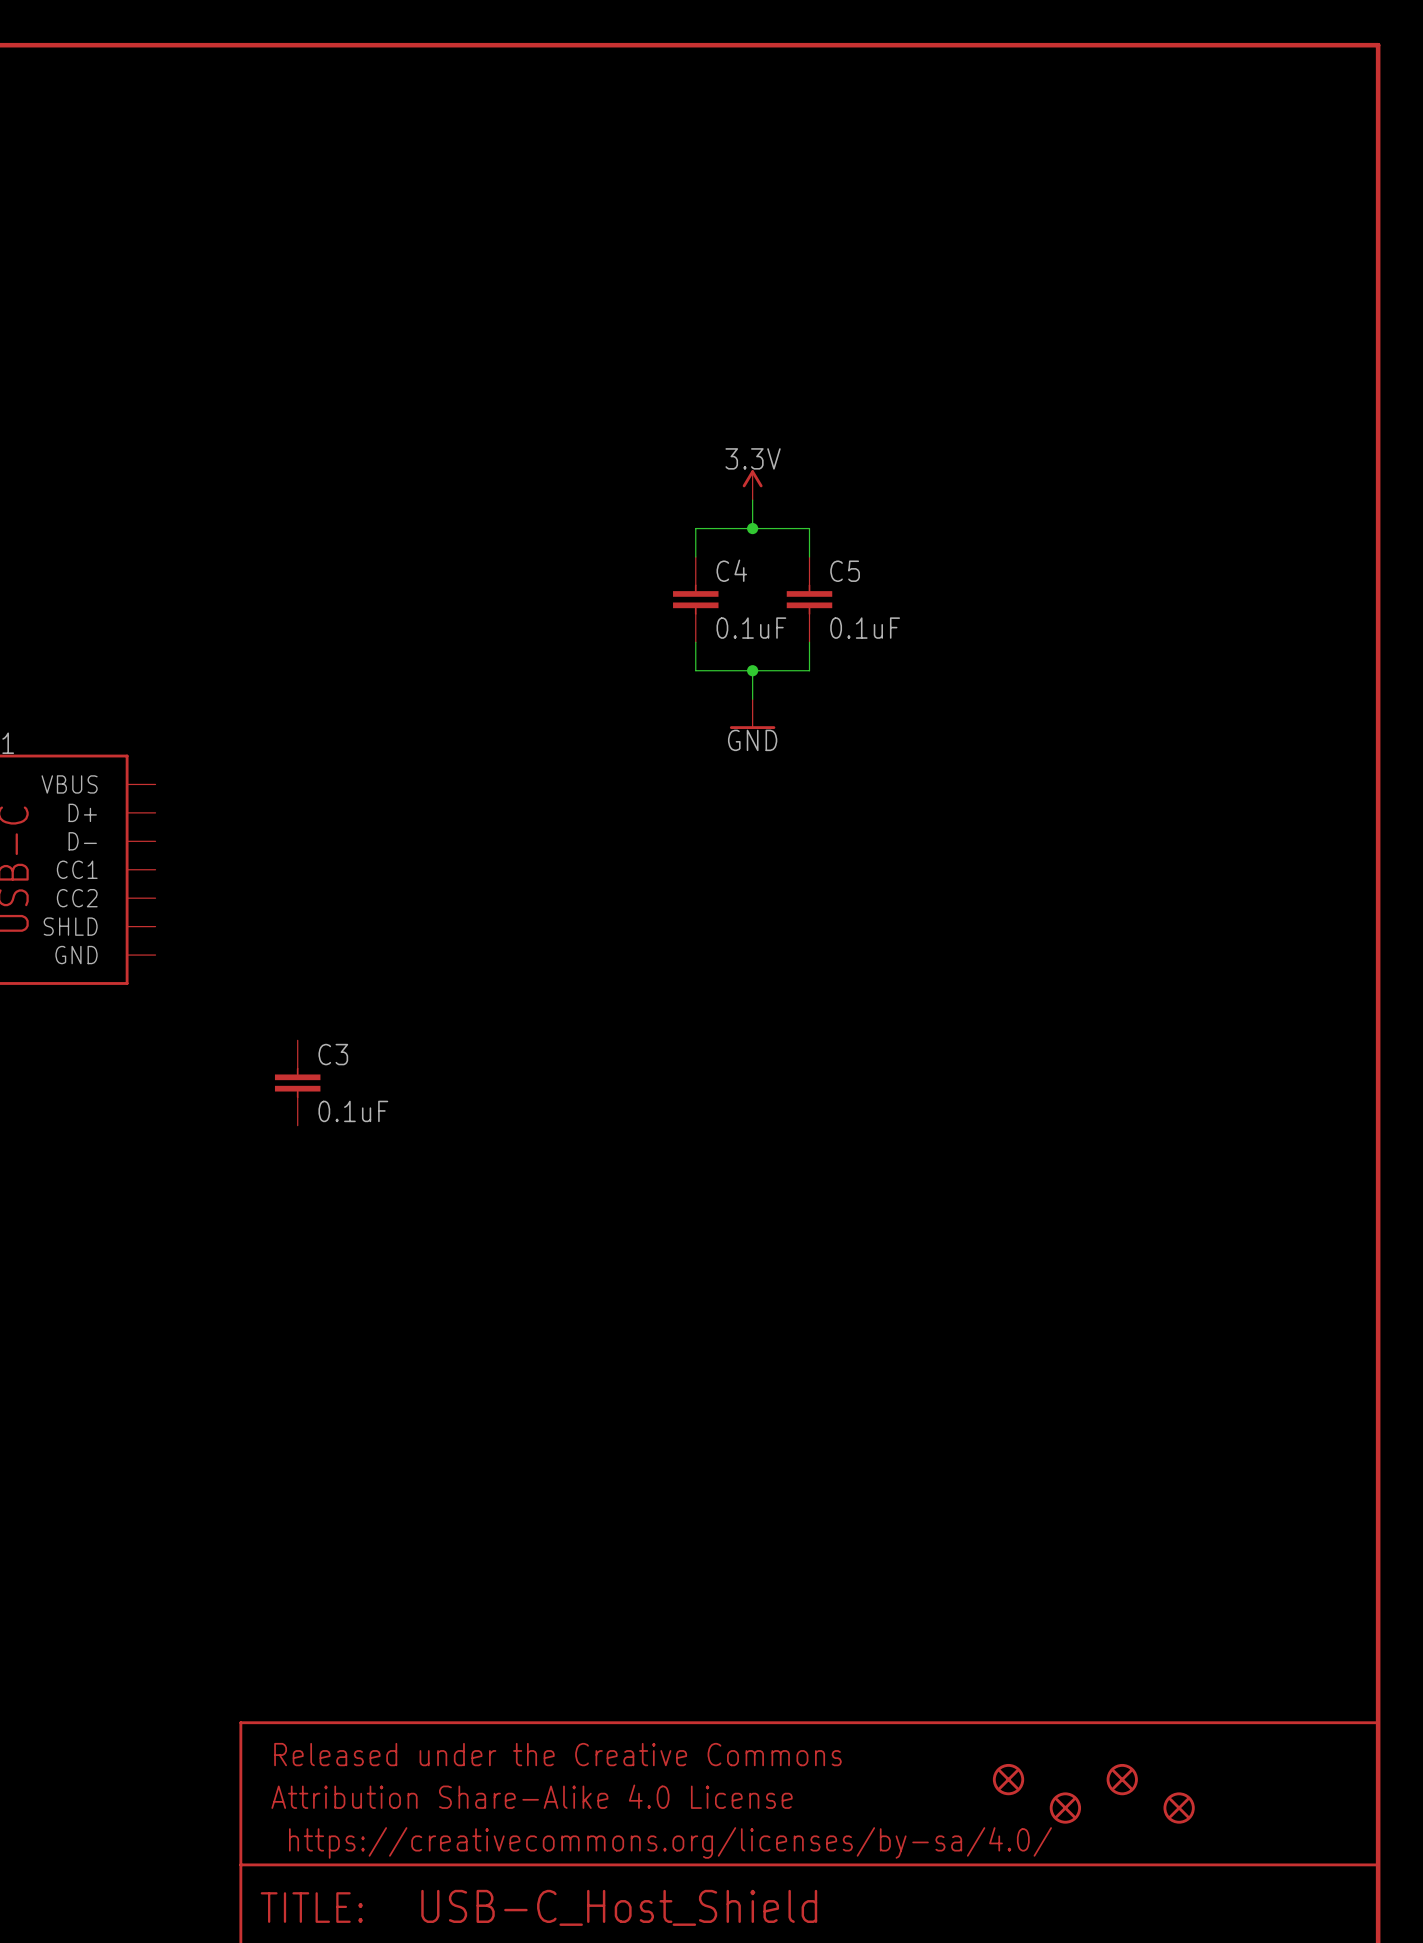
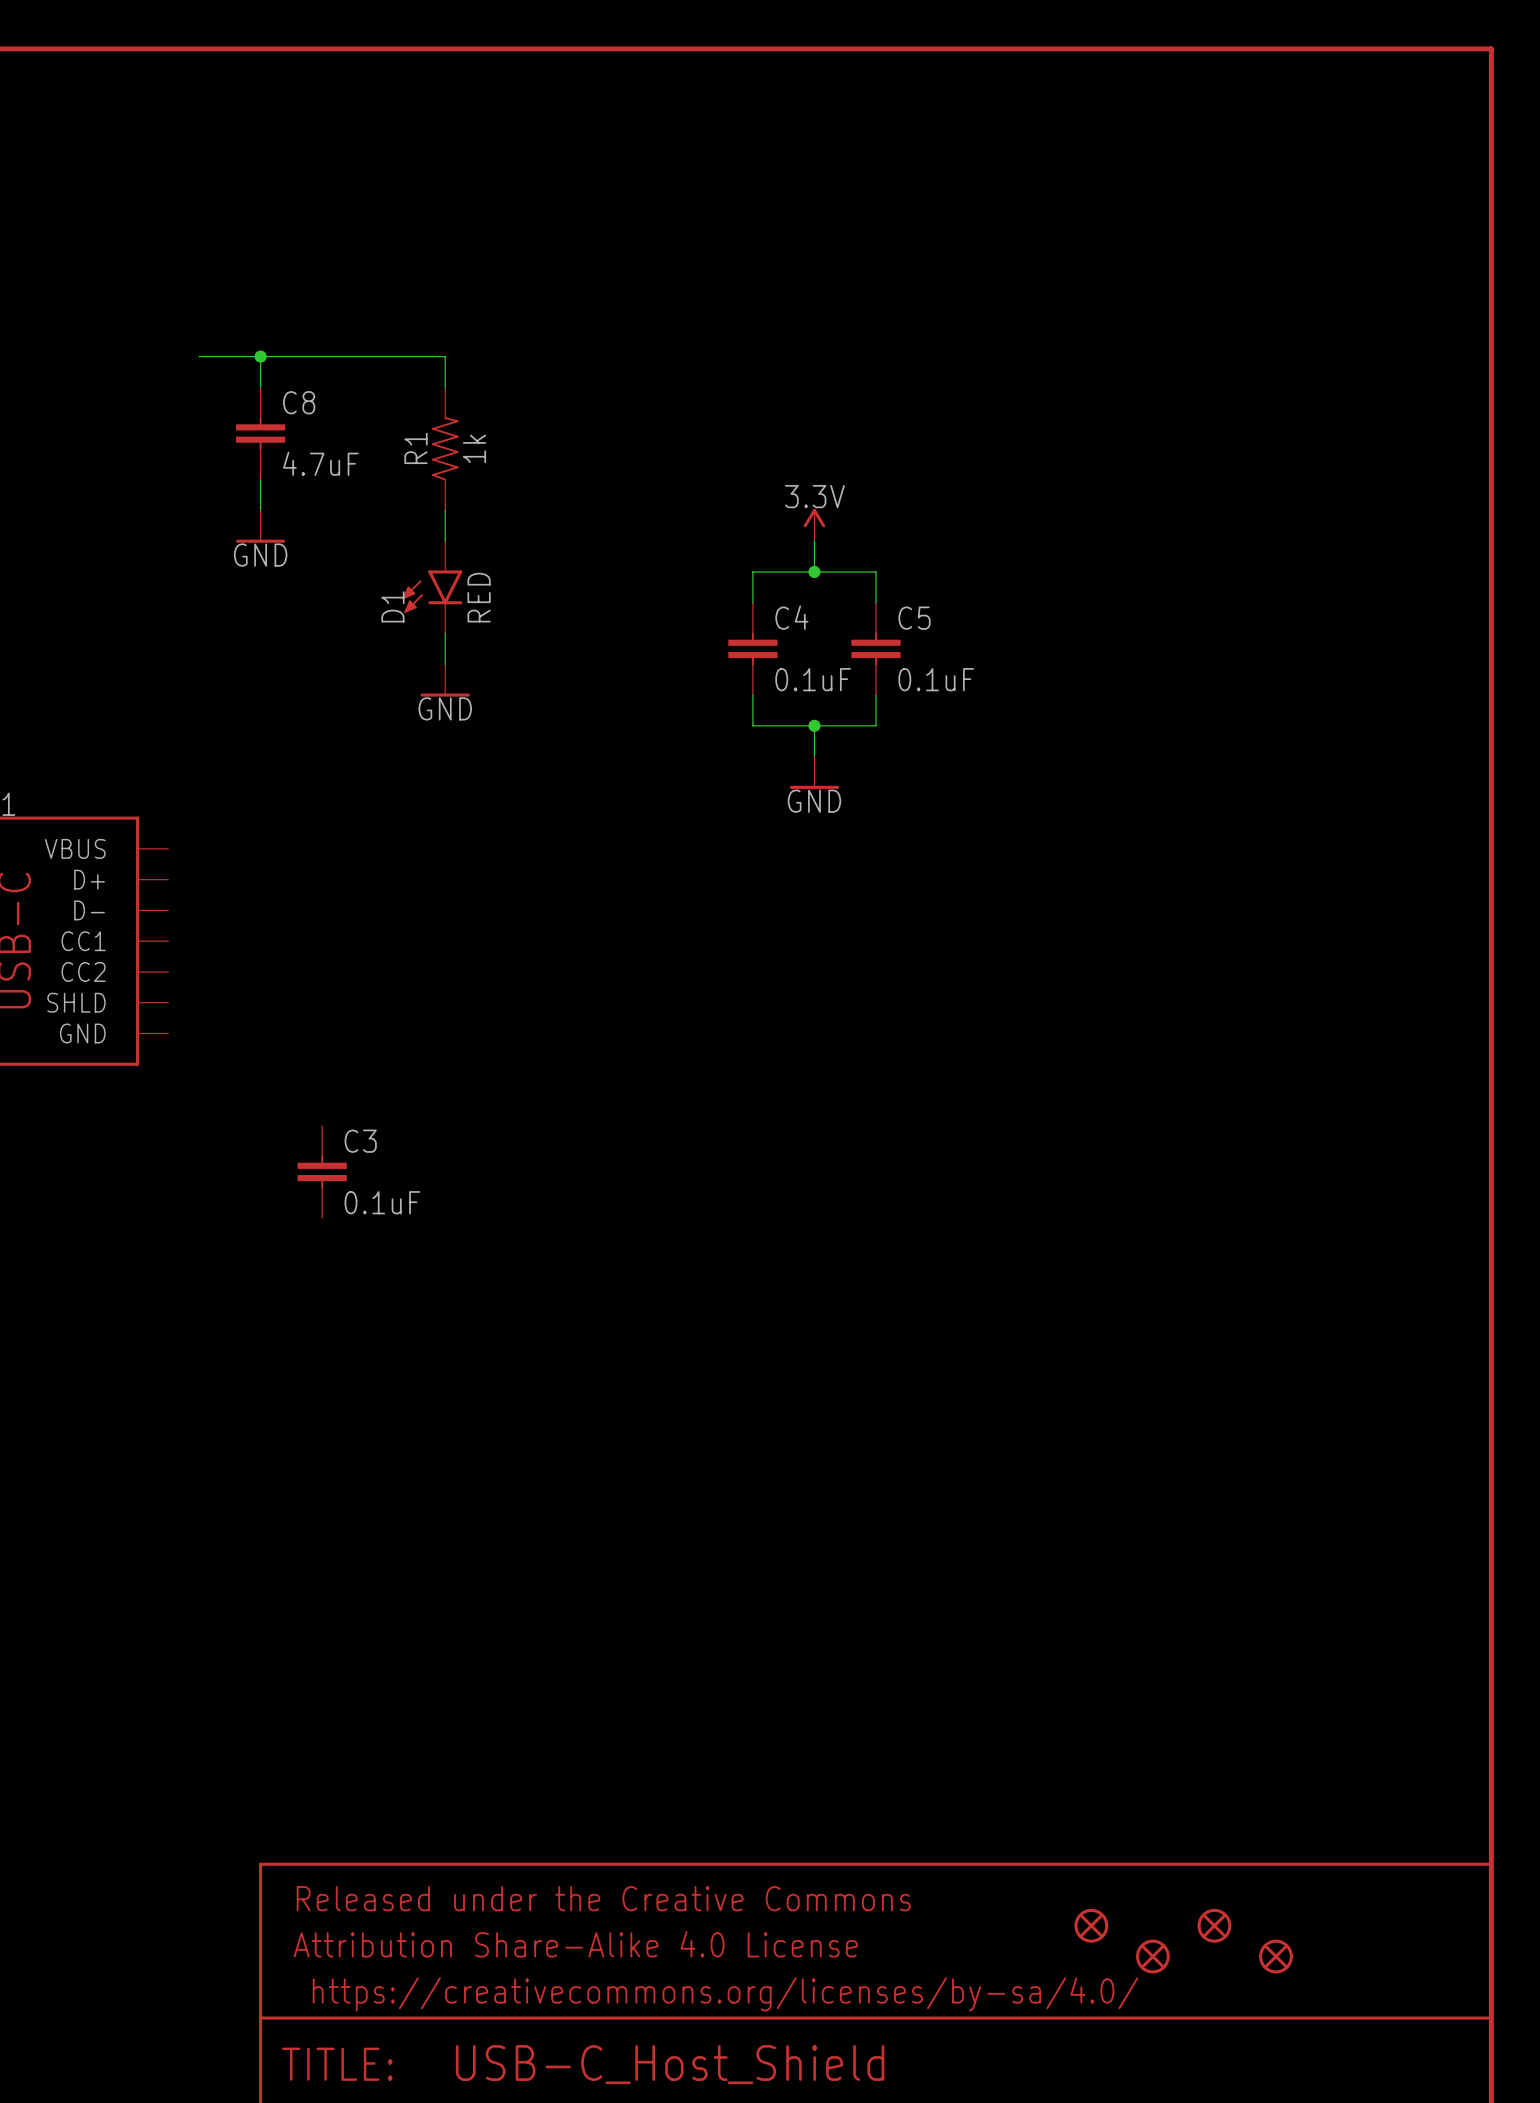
wire: none -> (199, 356) (445, 356) (445, 387)
wire: none -> (260, 356) (260, 387)
junction: none -> (260, 356)
C8: none -> 4.7uF (260, 433)
R1: none -> 1k (445, 448)
wire: none -> (260, 479) (260, 510)
wire: none -> (445, 510) (445, 541)
power symbol: none -> GND (260, 526)
D1: none -> RED (432, 587)
wire: none -> (445, 633) (445, 664)
power symbol: none -> GND (445, 680)

